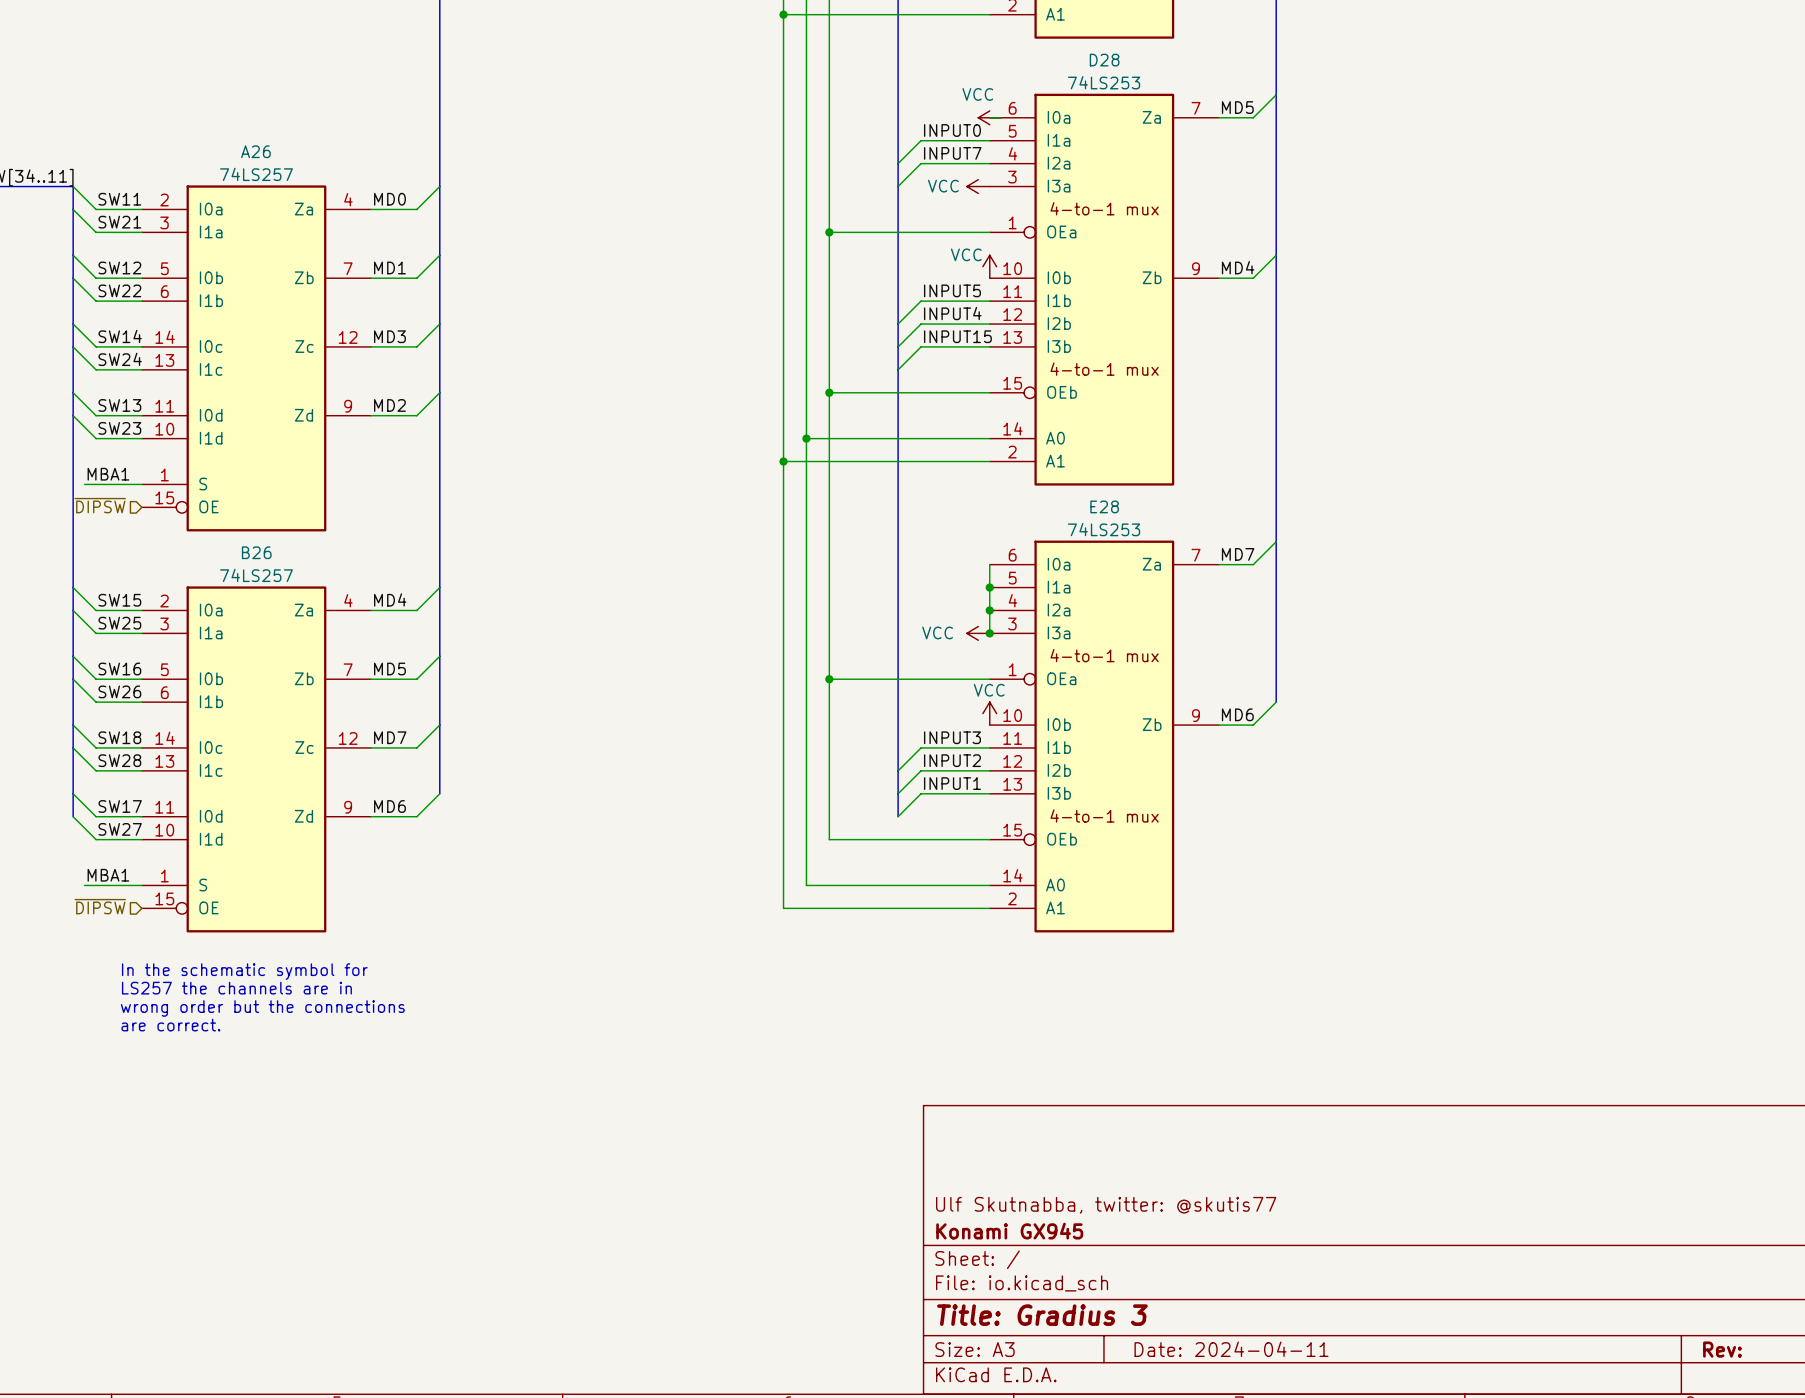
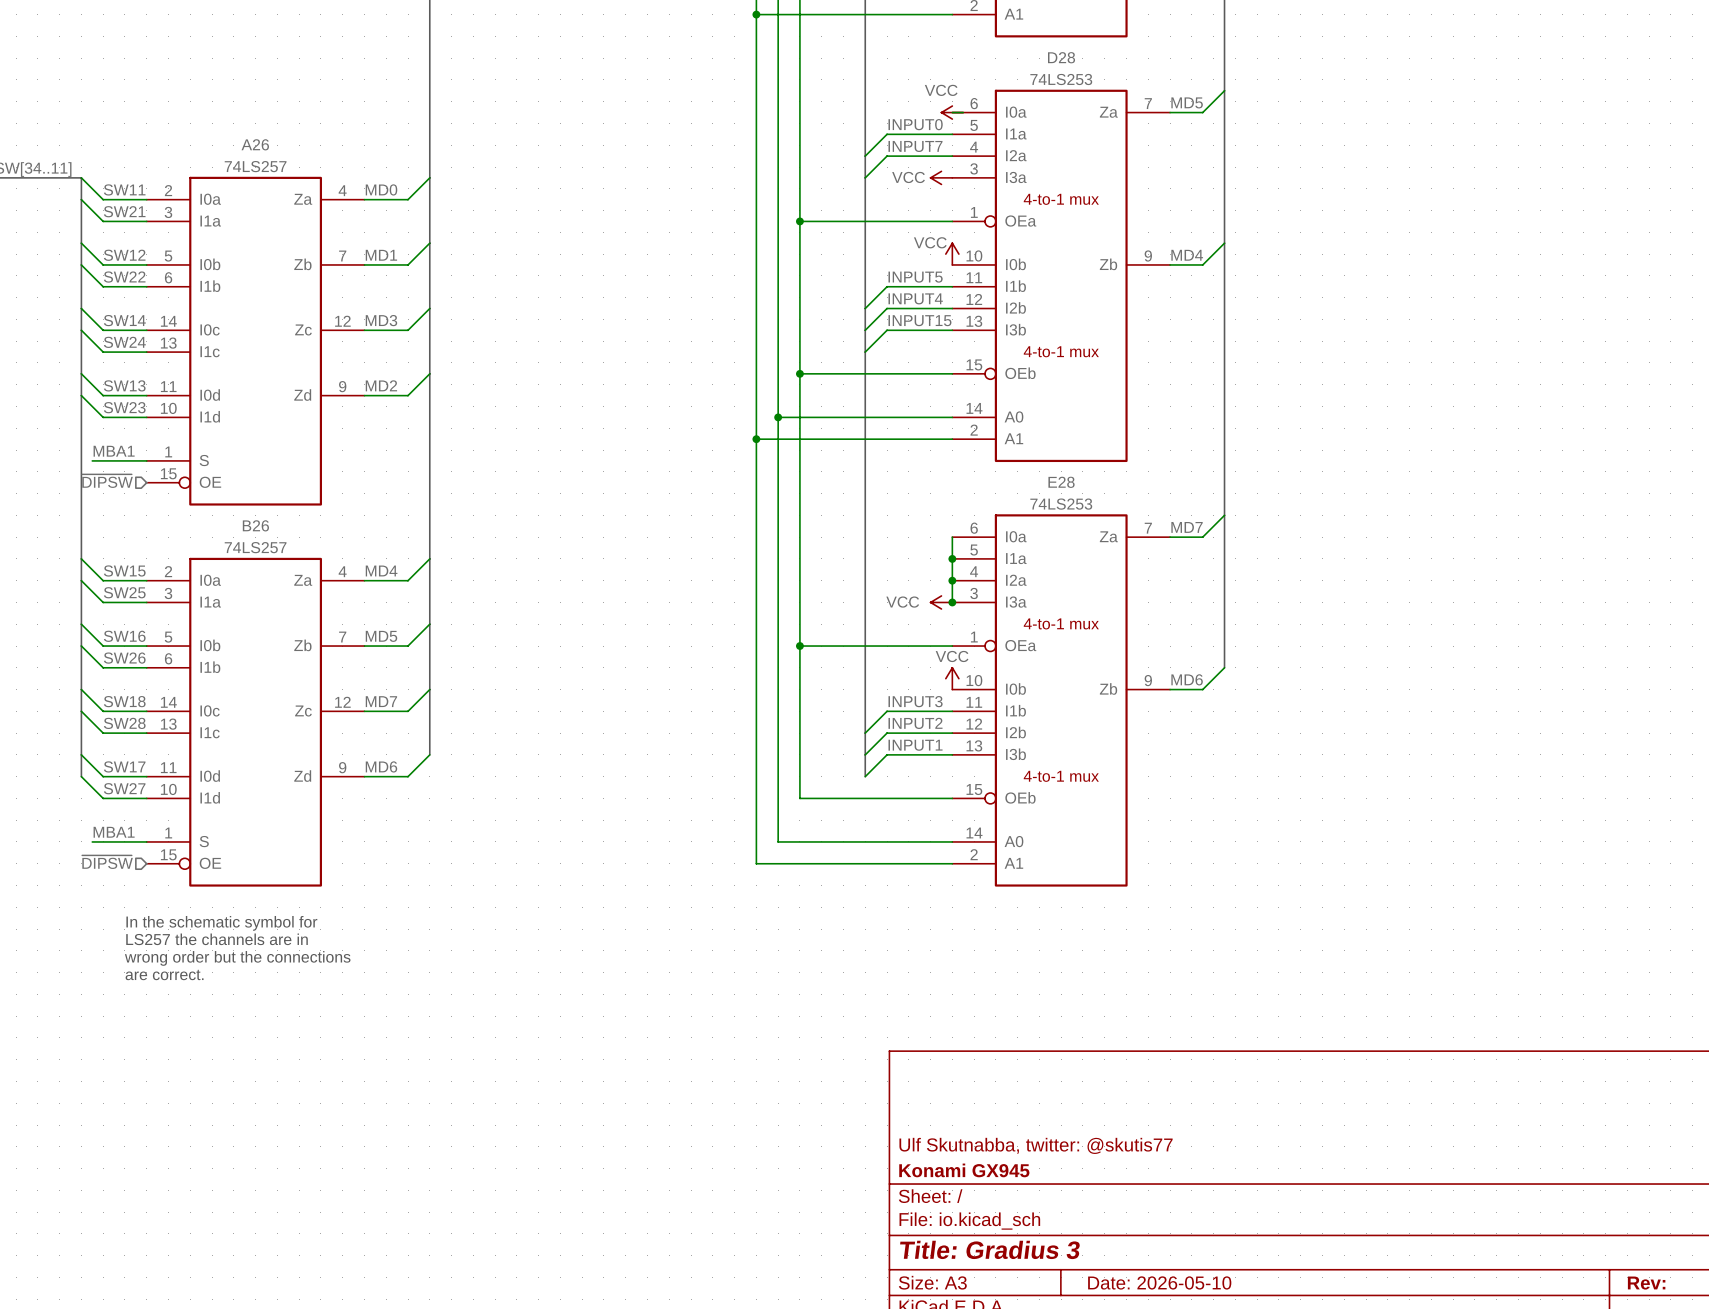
title block: Date: 2024-04-11 (1231, 1349) -> Date: 2026-05-10 (1159, 1282)

